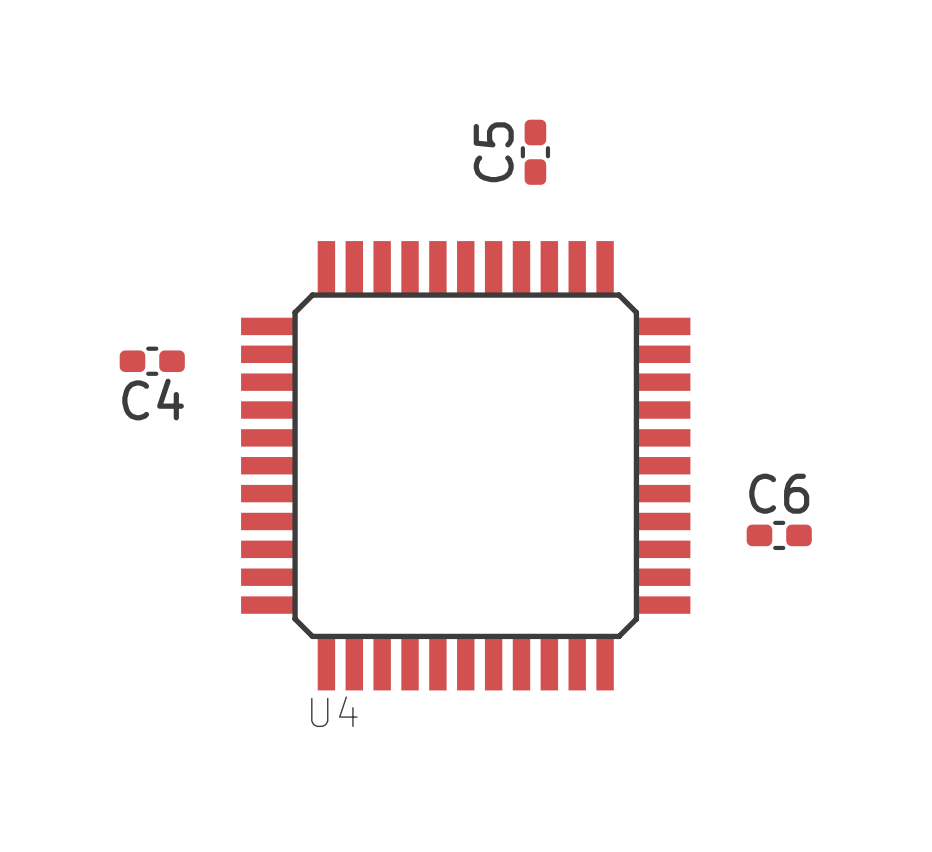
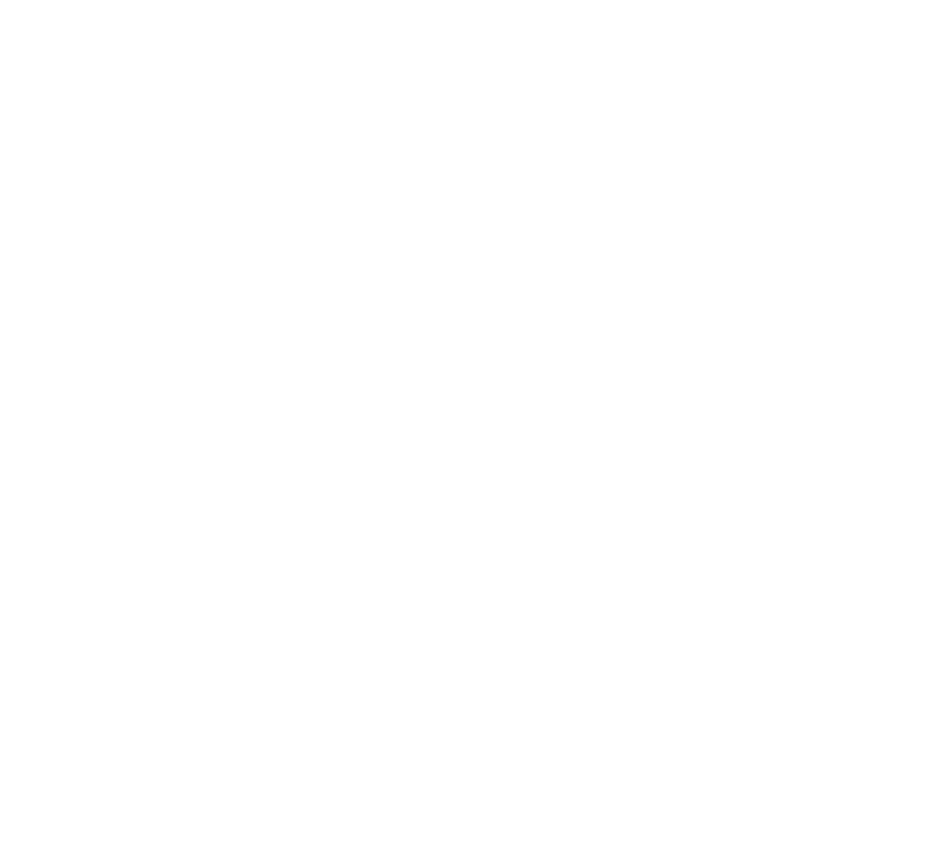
C5: (535, 152) -> none
C4: (152, 361) -> none
U4: (465, 465) -> none
C6: (779, 535) -> none

